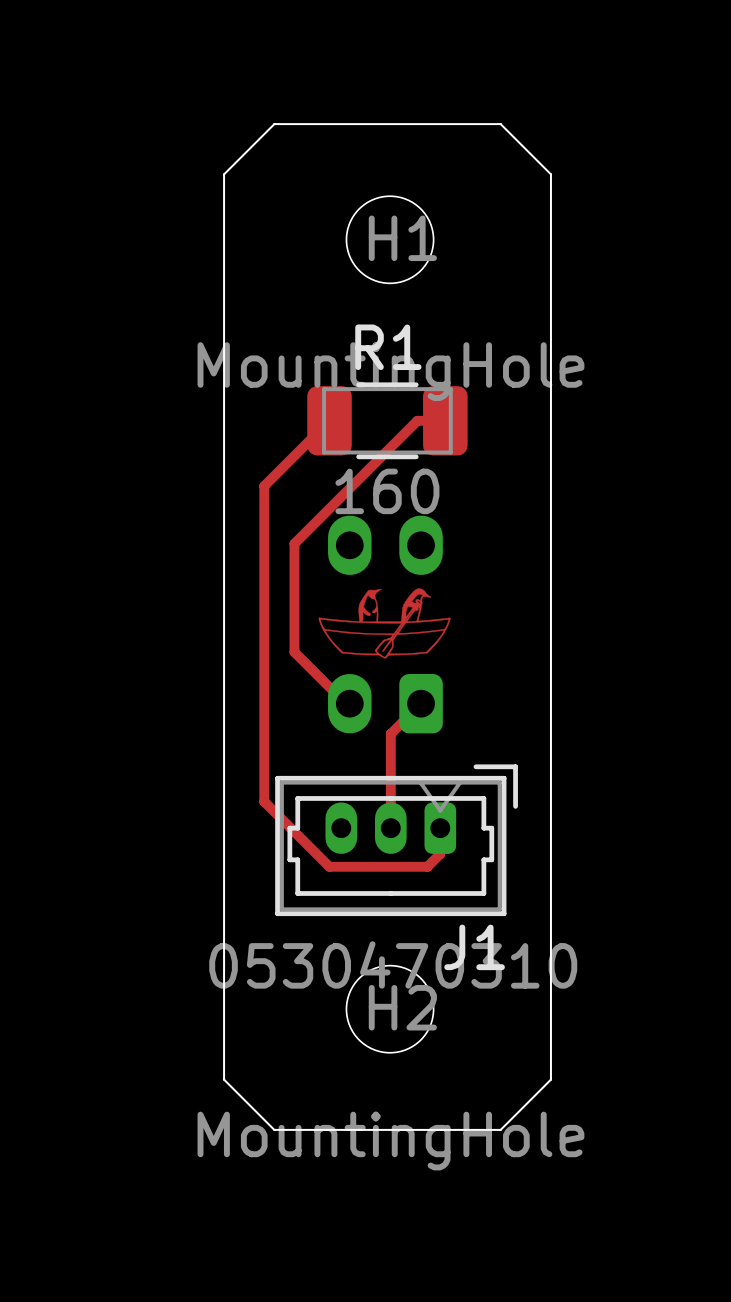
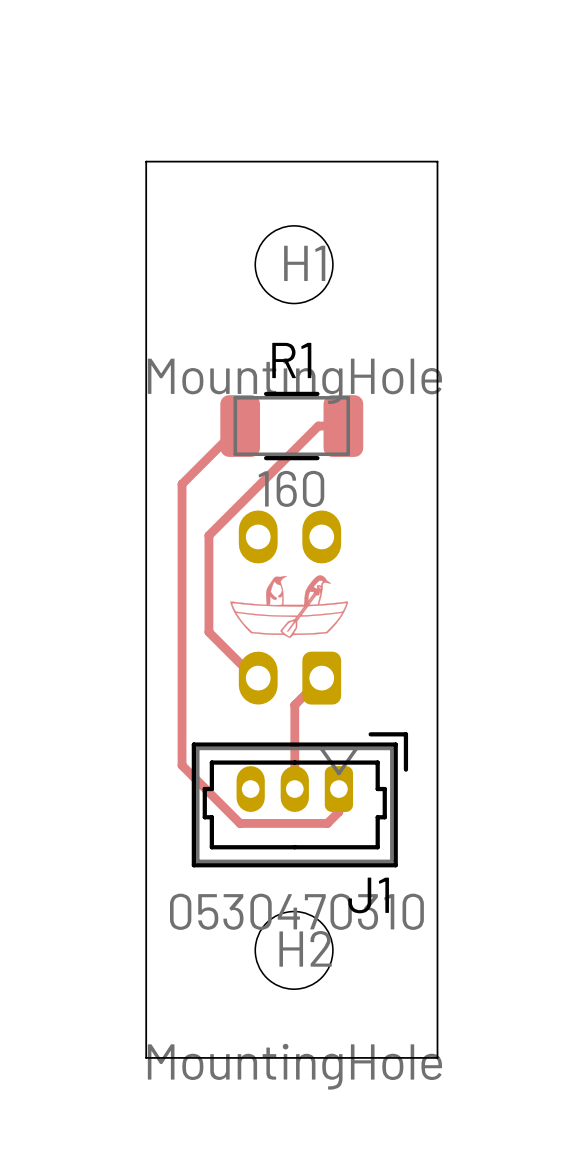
board edge: (274, 124) (224, 174) -> (191, 161) (146, 161) (146, 206)
board edge: (500, 124) (550, 174) -> (392, 161) (437, 161) (437, 206)
board edge: (224, 1079) (274, 1129) -> (146, 1013) (146, 1057) (191, 1057)
board edge: (550, 1079) (500, 1129) -> (437, 1013) (437, 1057) (392, 1057)

